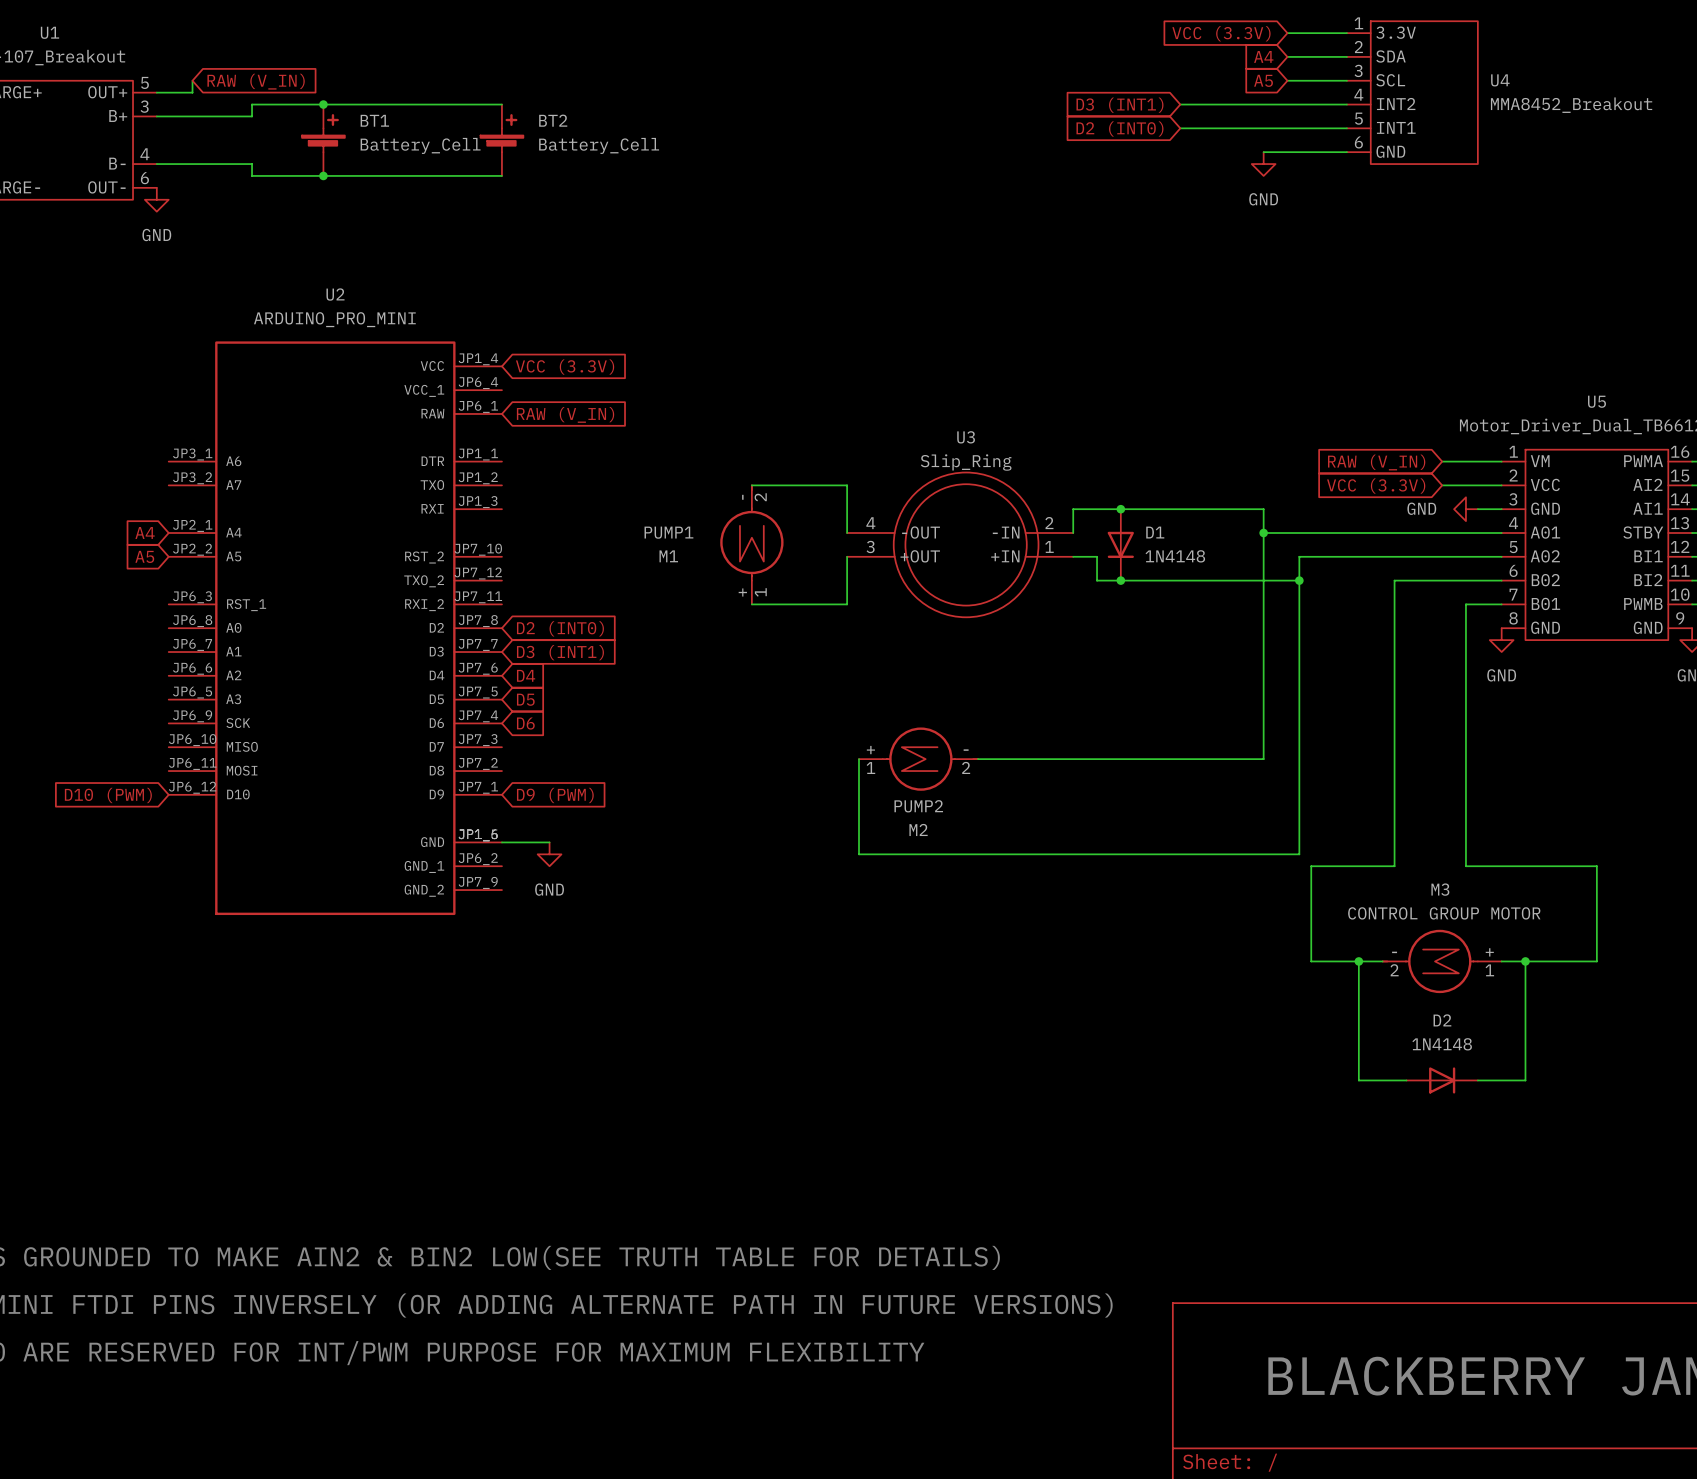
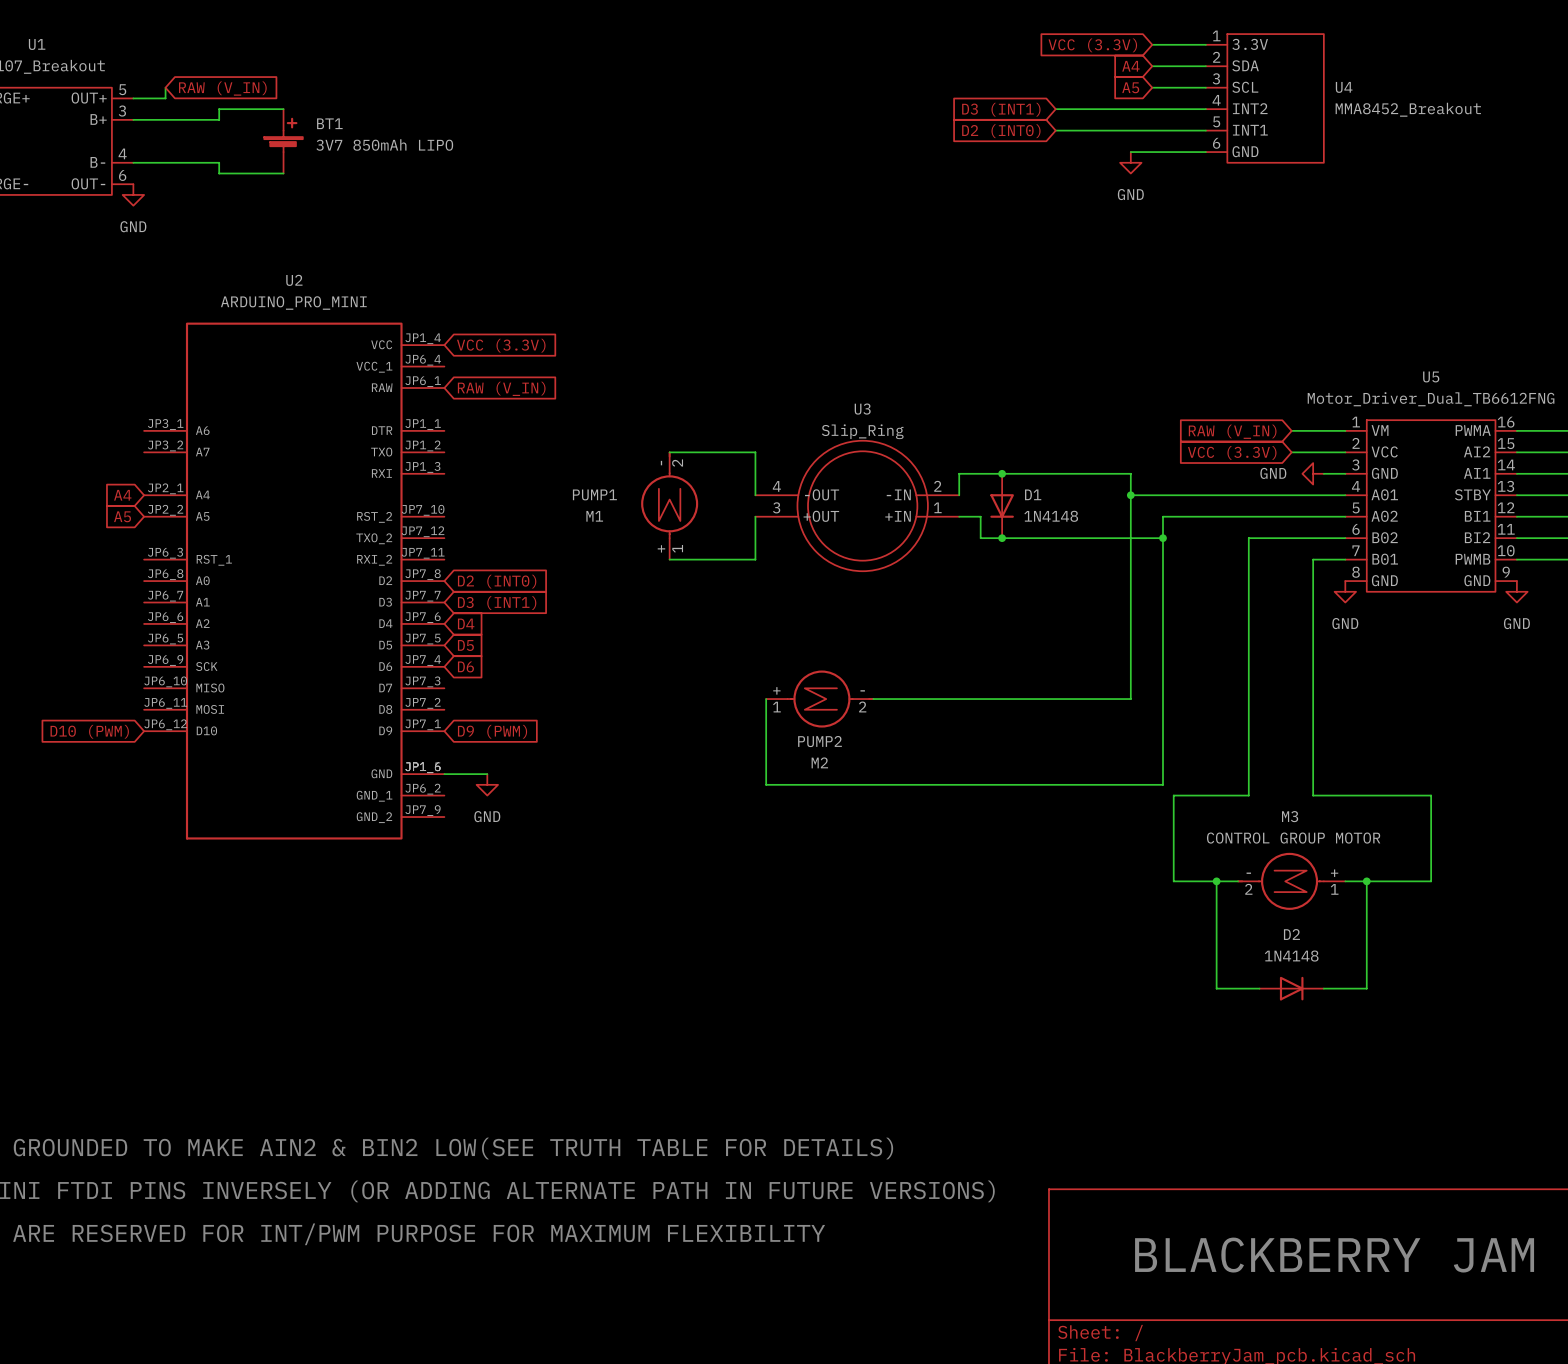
wire: (323, 104) (501, 104) -> none
junction: (323, 104) -> none
BT2: Battery_Cell (501, 140) -> none
BT1 value: Battery_Cell (420, 145) -> 3V7 850mAh LIPO (384, 144)
wire: (323, 175) (501, 175) -> none
junction: (323, 175) -> none

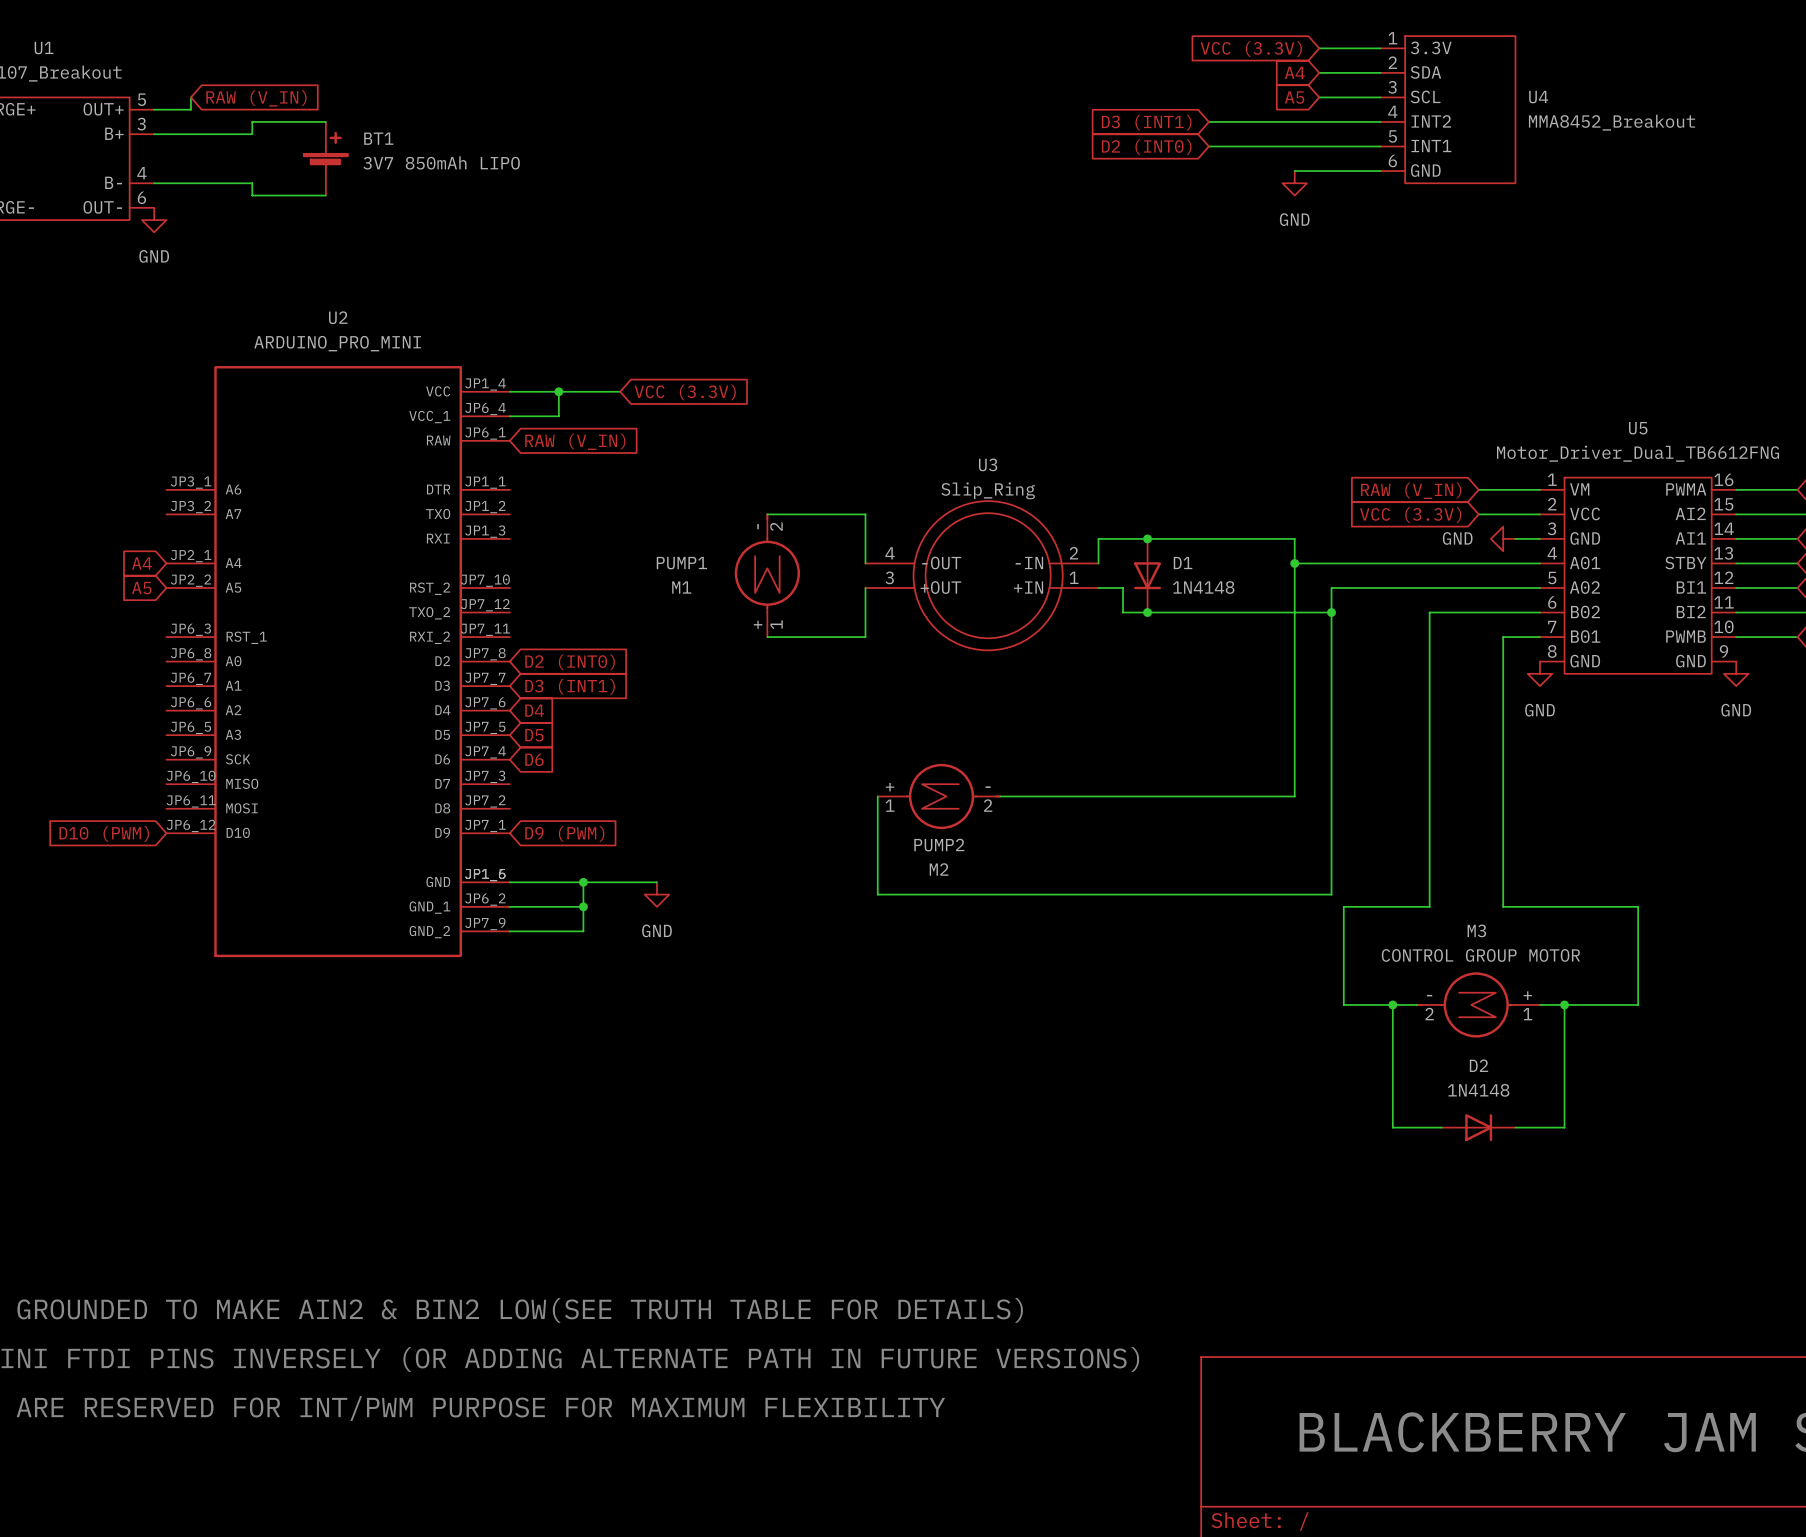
wire: none -> (509, 391) (620, 391)
wire: none -> (558, 391) (558, 416) (509, 416)
junction: none -> (558, 391)
global label position: VCC (3.3V) (501, 345) -> VCC (3.3V) (685, 392)
wire: none -> (558, 882) (657, 882)
wire: none -> (583, 882) (583, 931) (509, 931)
junction: none -> (583, 882)
power symbol position: GND (487, 784) -> GND (657, 894)
wire: none -> (509, 906) (583, 906)
junction: none -> (583, 906)

